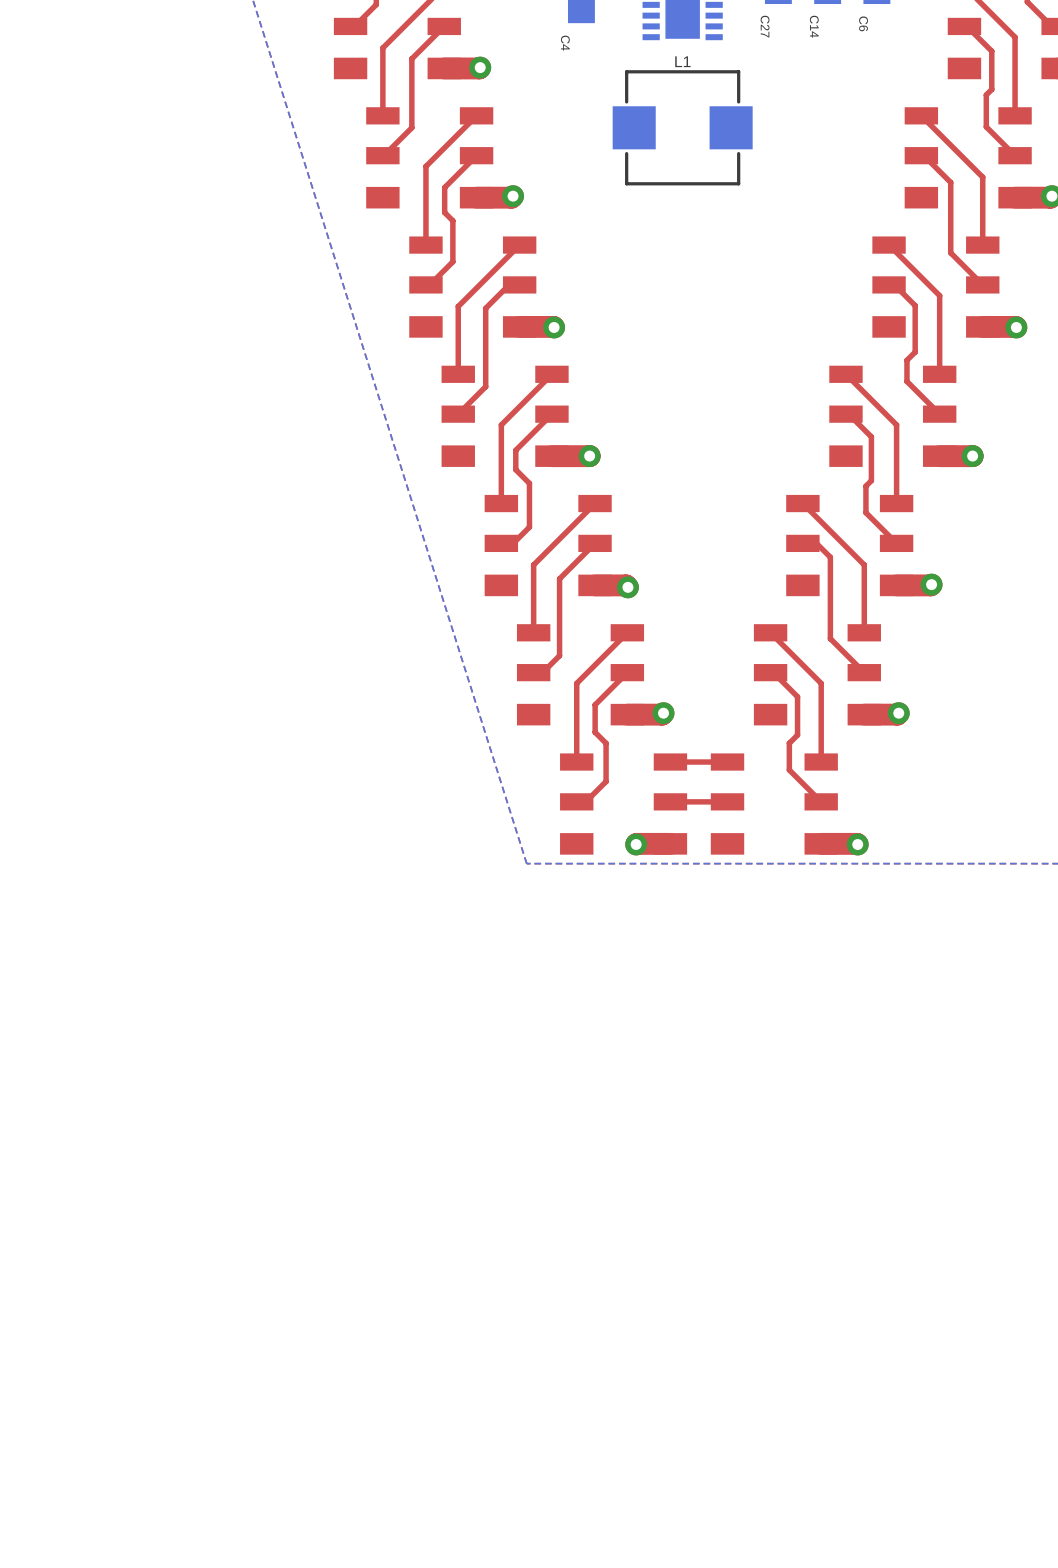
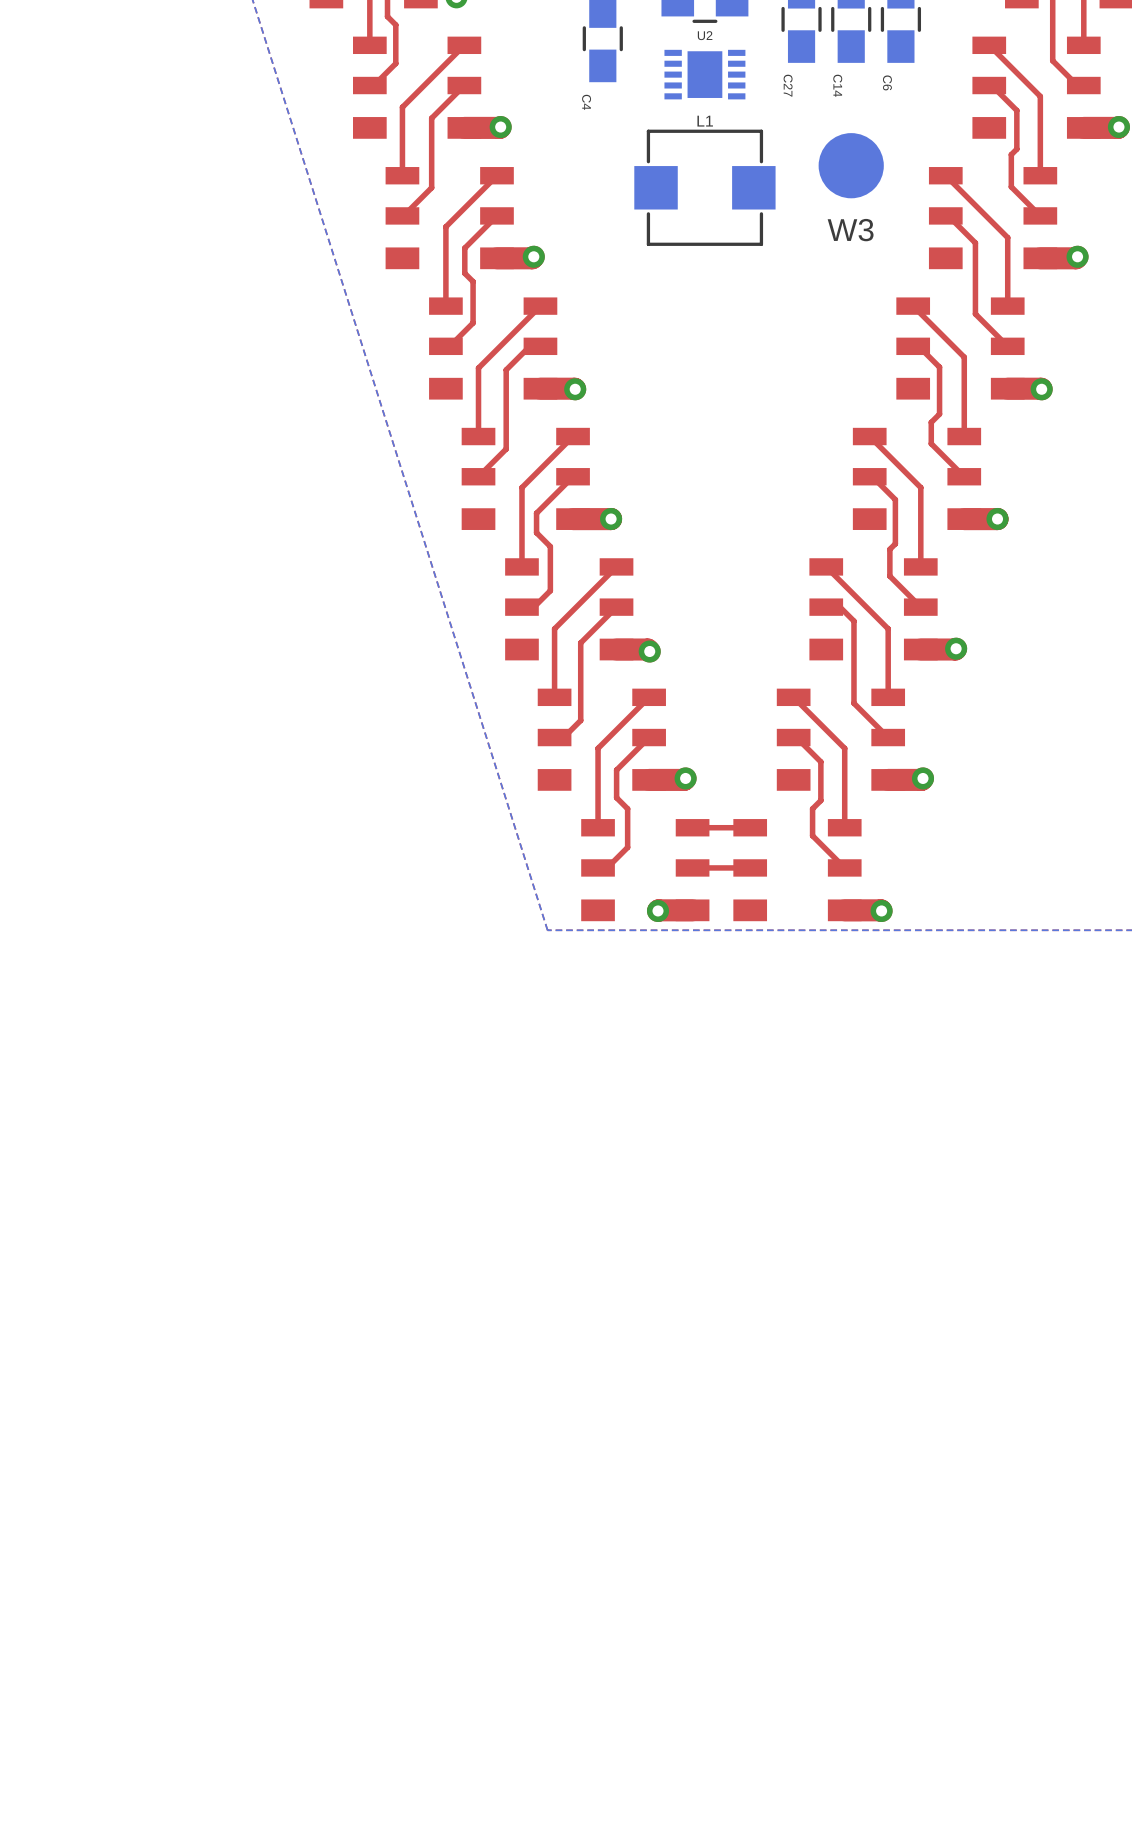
W3: none -> (851, 165)

